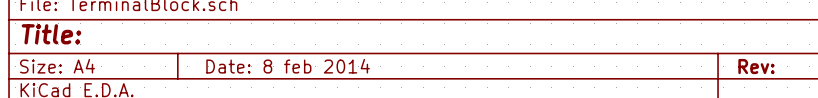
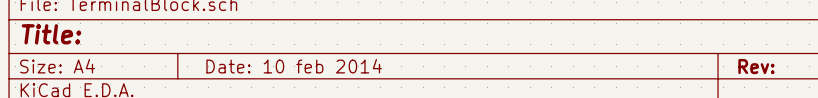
title block: Date: 8 feb 2014 (288, 66) -> Date: 10 feb 2014 (294, 66)

